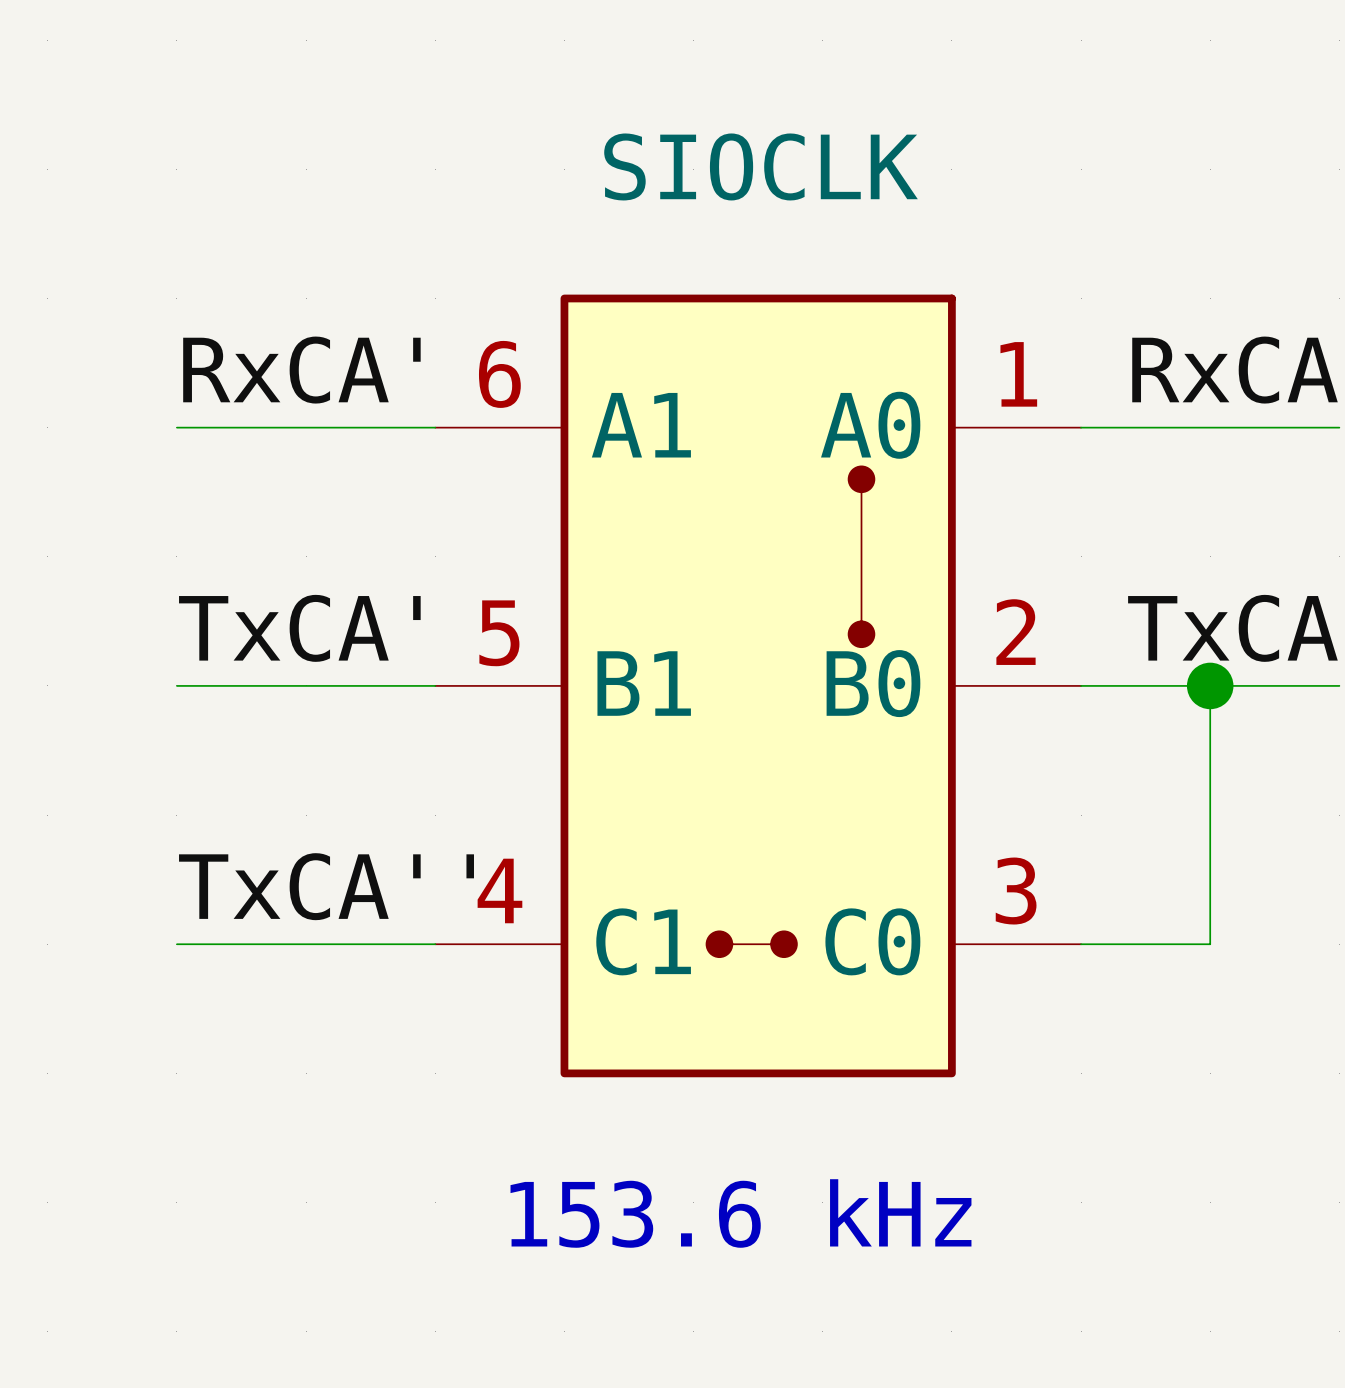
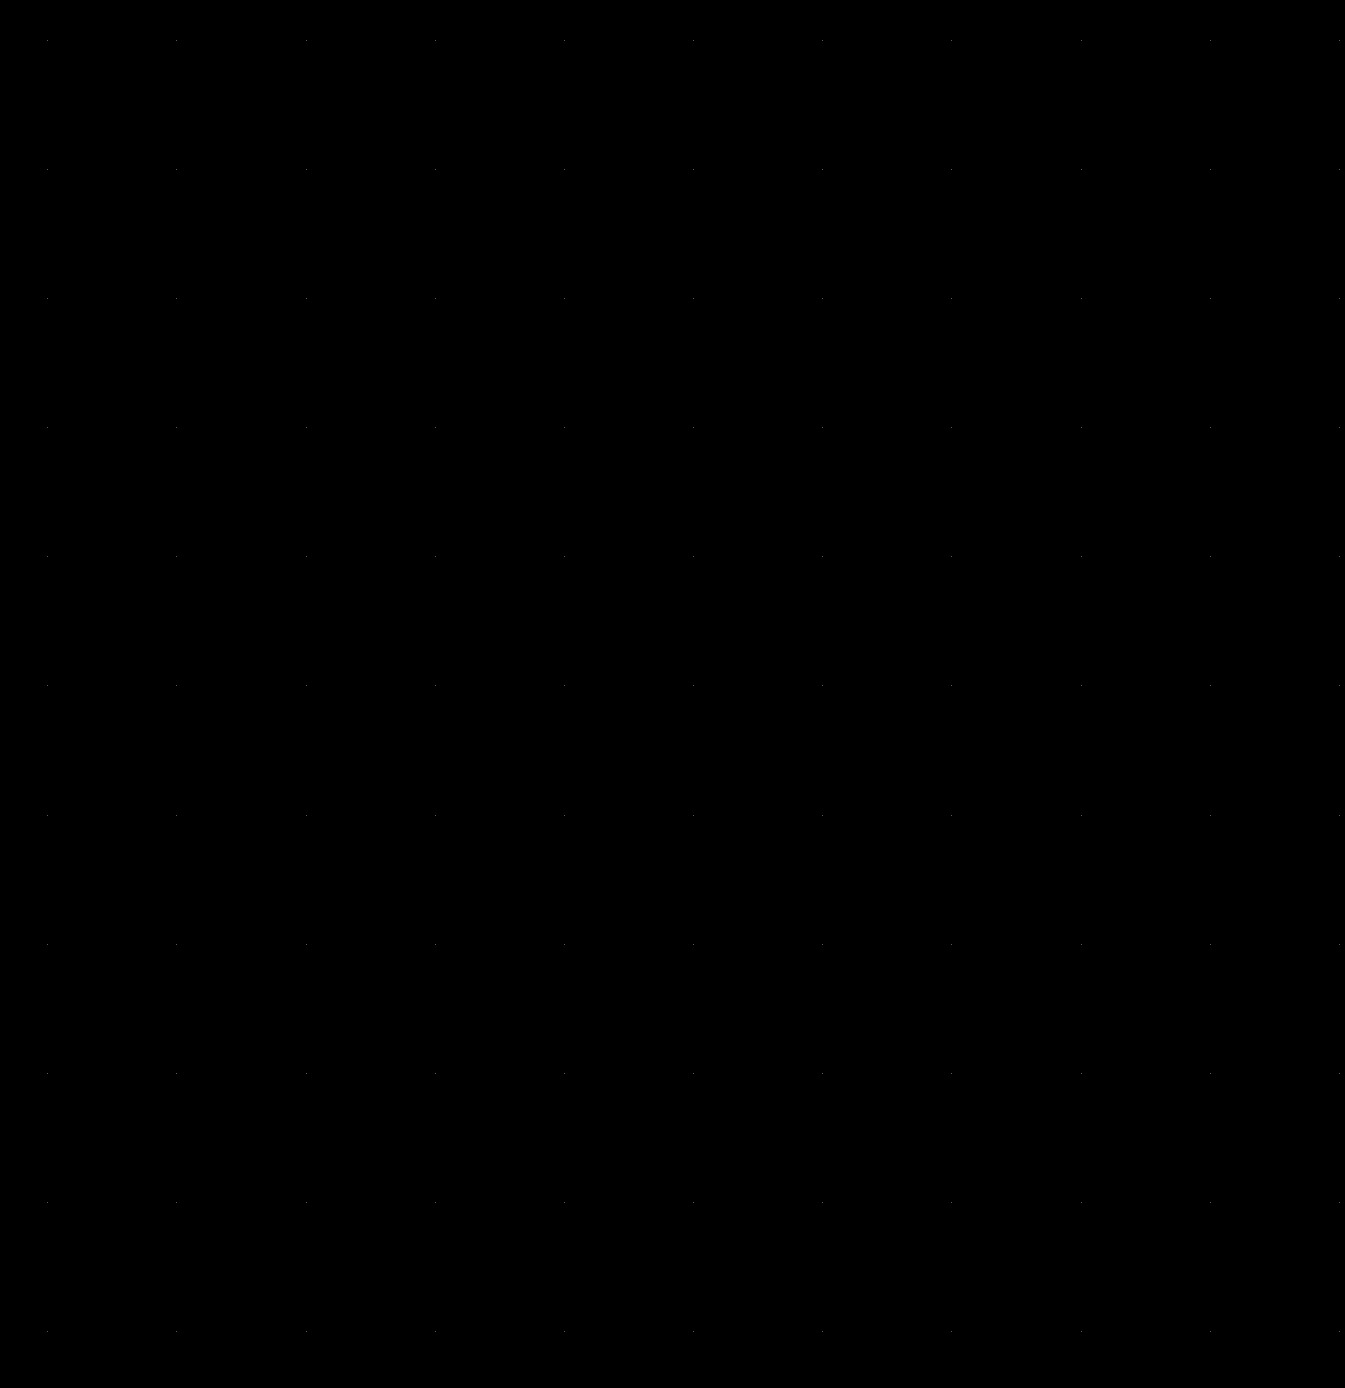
label: RxCA' (301, 370) -> none
label: RxCA (1235, 370) -> none
wire: (176, 427) (435, 427) -> none
wire: (1081, 427) (1339, 427) -> none
label: TxCA' (299, 628) -> none
label: TxCA (1232, 628) -> none
wire: (176, 685) (435, 685) -> none
part: SIOCLK (758, 685) -> none
wire: (1081, 685) (1339, 685) -> none
wire: (1210, 685) (1210, 944) (1081, 944) -> none
junction: (1210, 685) -> none
label: TxCA'' (326, 886) -> none
wire: (176, 944) (435, 944) -> none
text: 153.6 kHz (740, 1213) -> none

